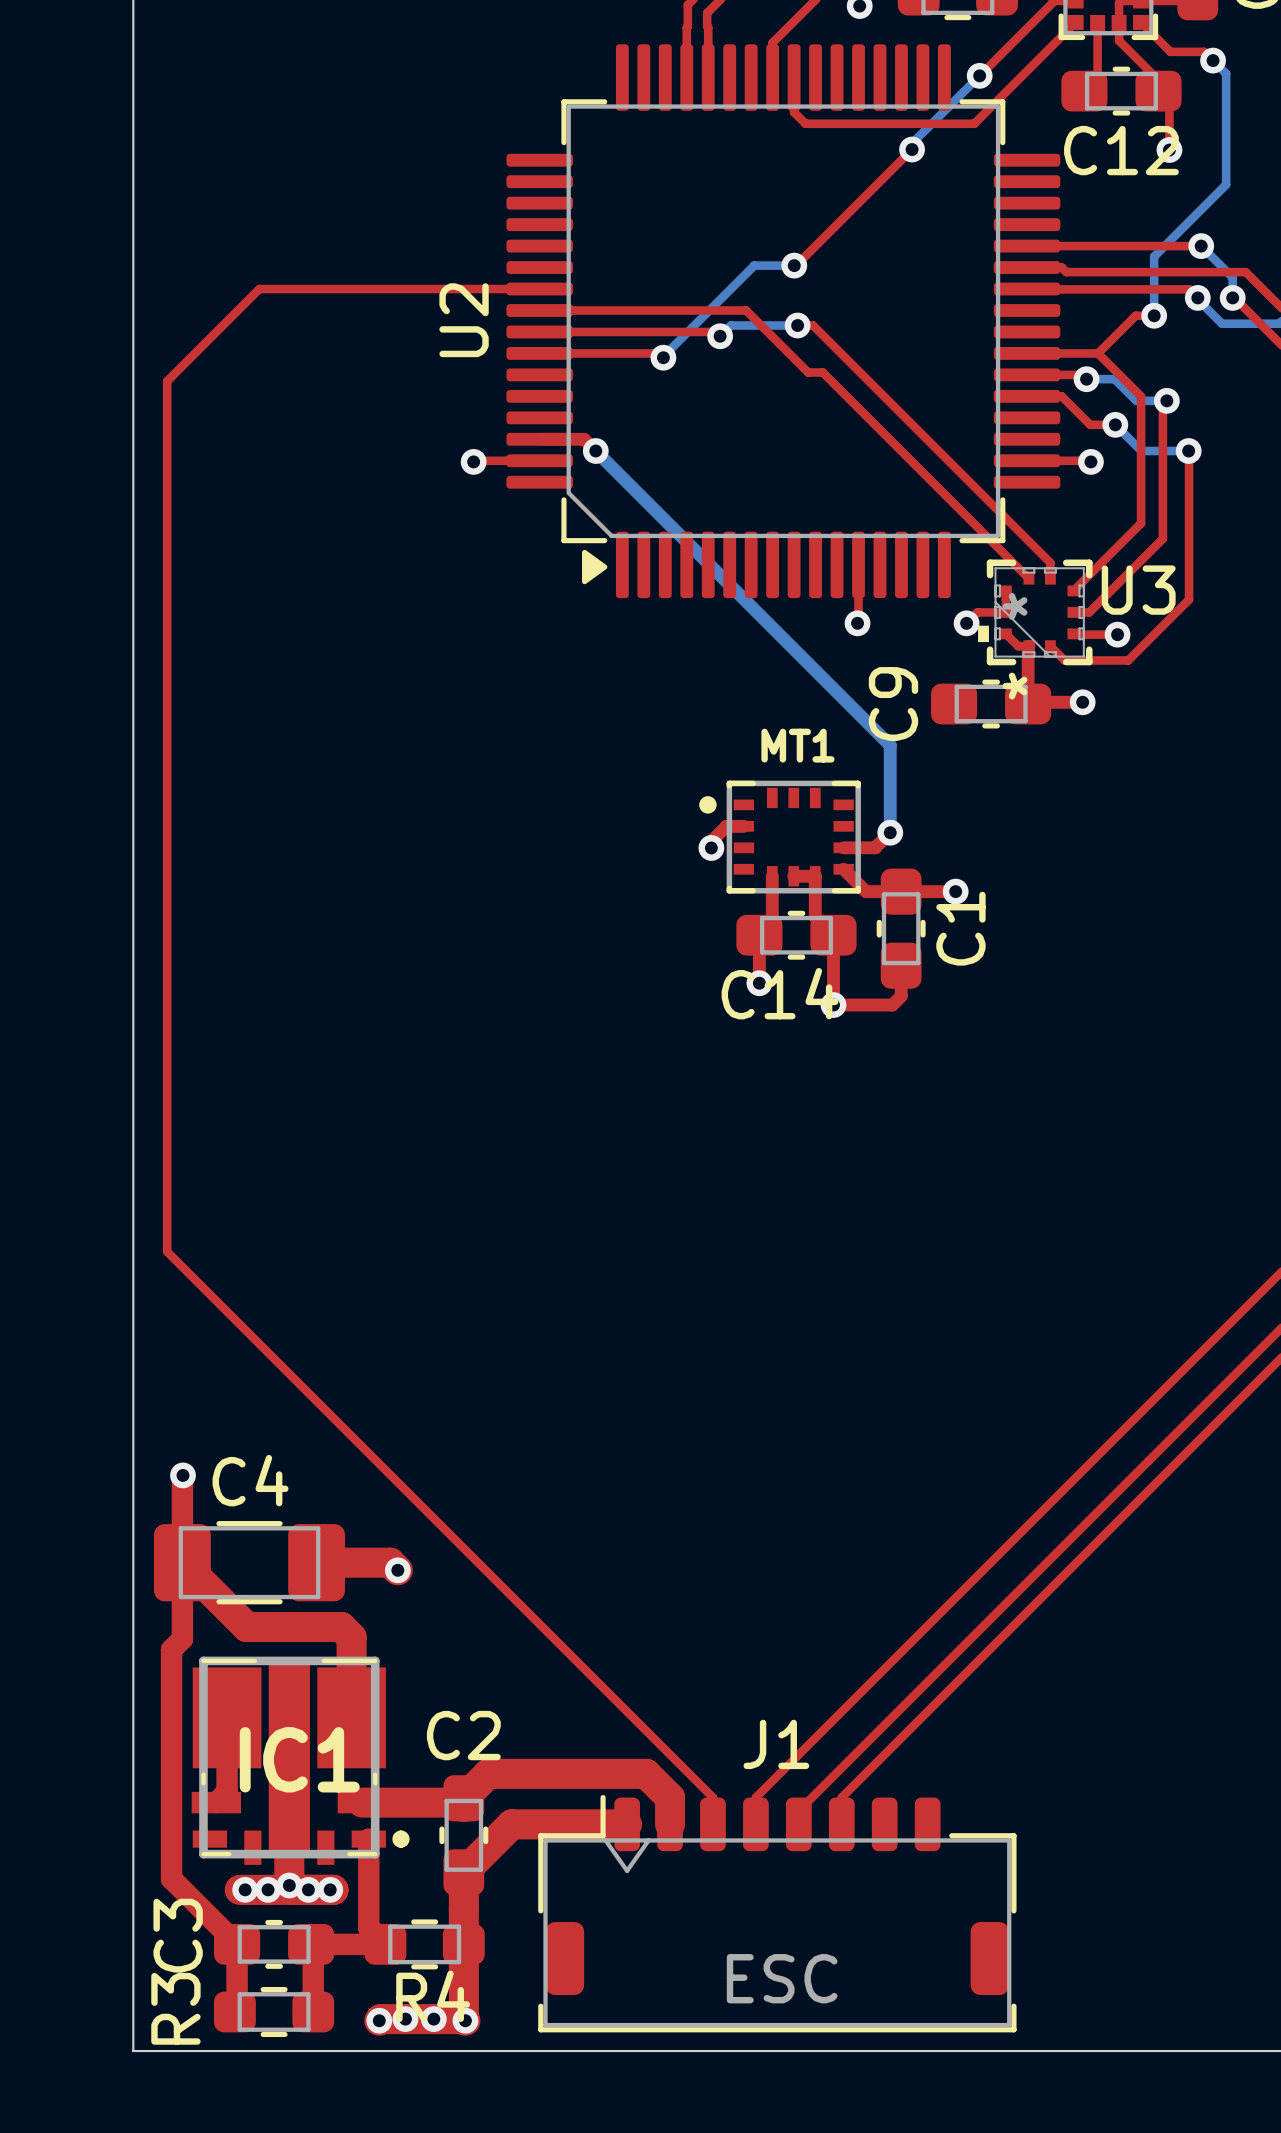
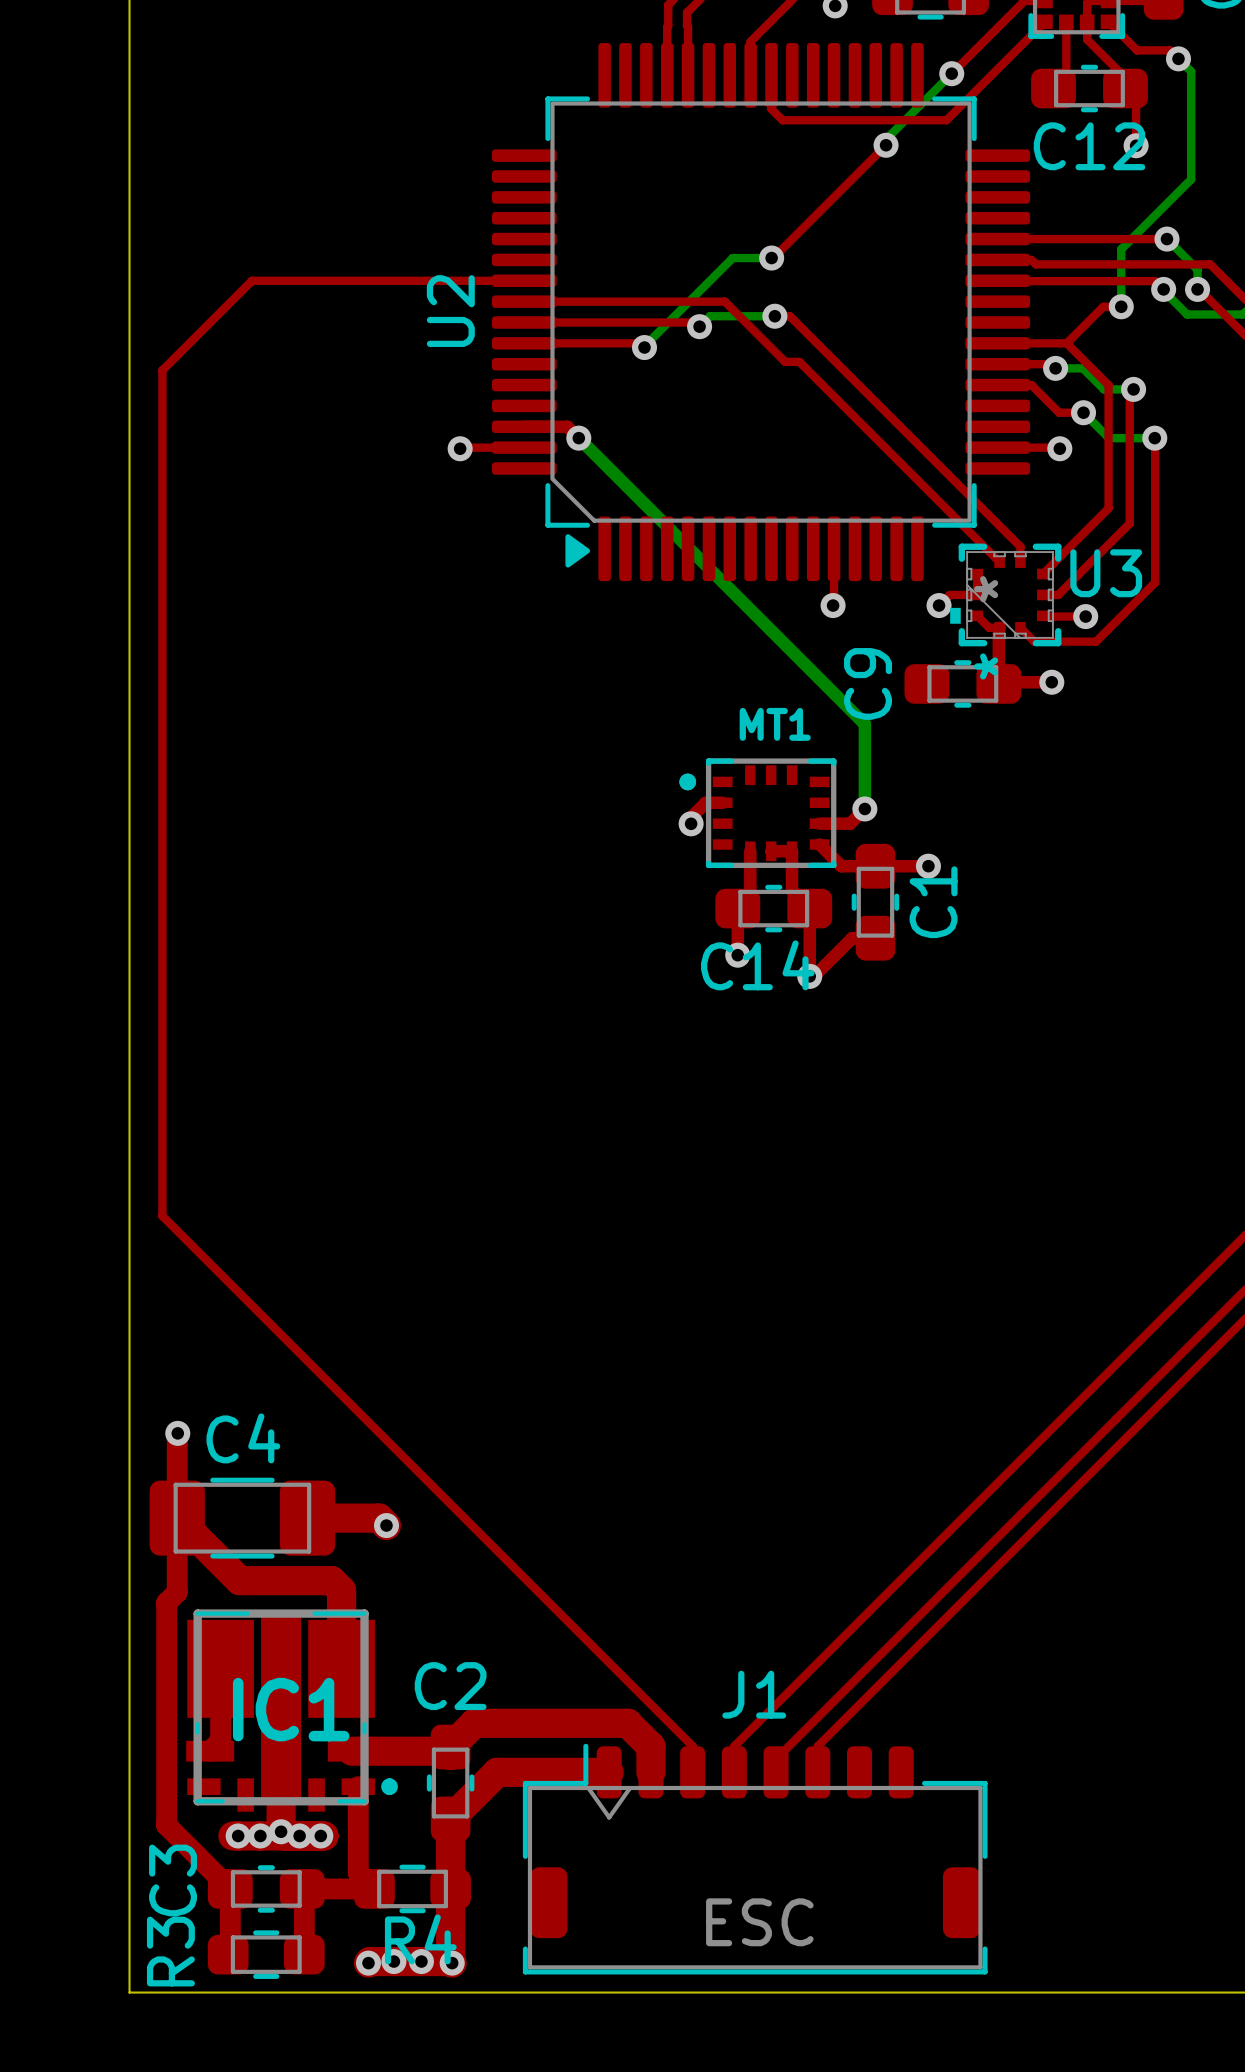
top track: (901, 965) (901, 996) (892, 1005) (833, 1005) -> (875, 938) (852, 938) (809, 980)

